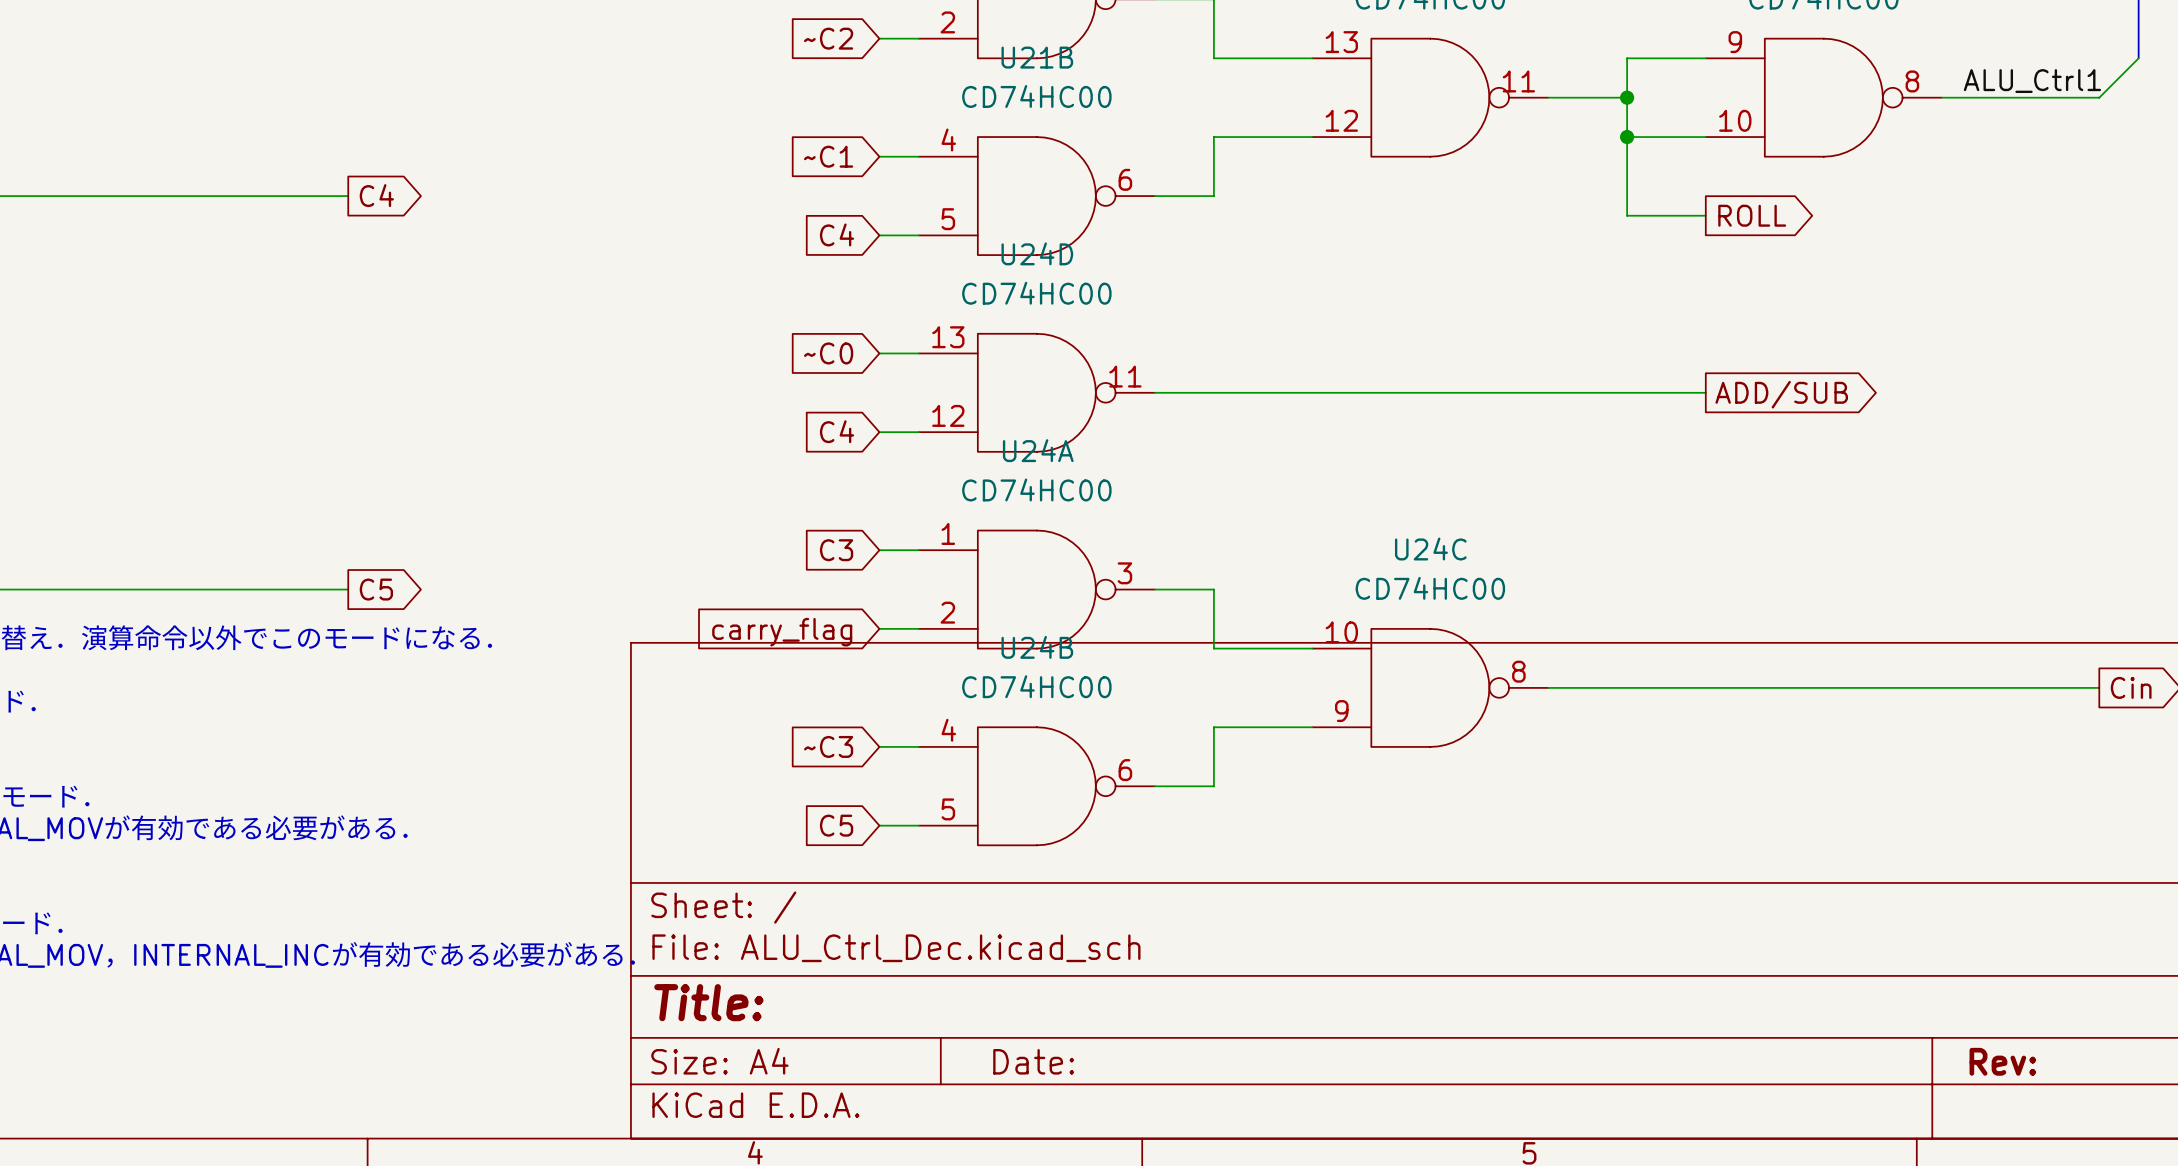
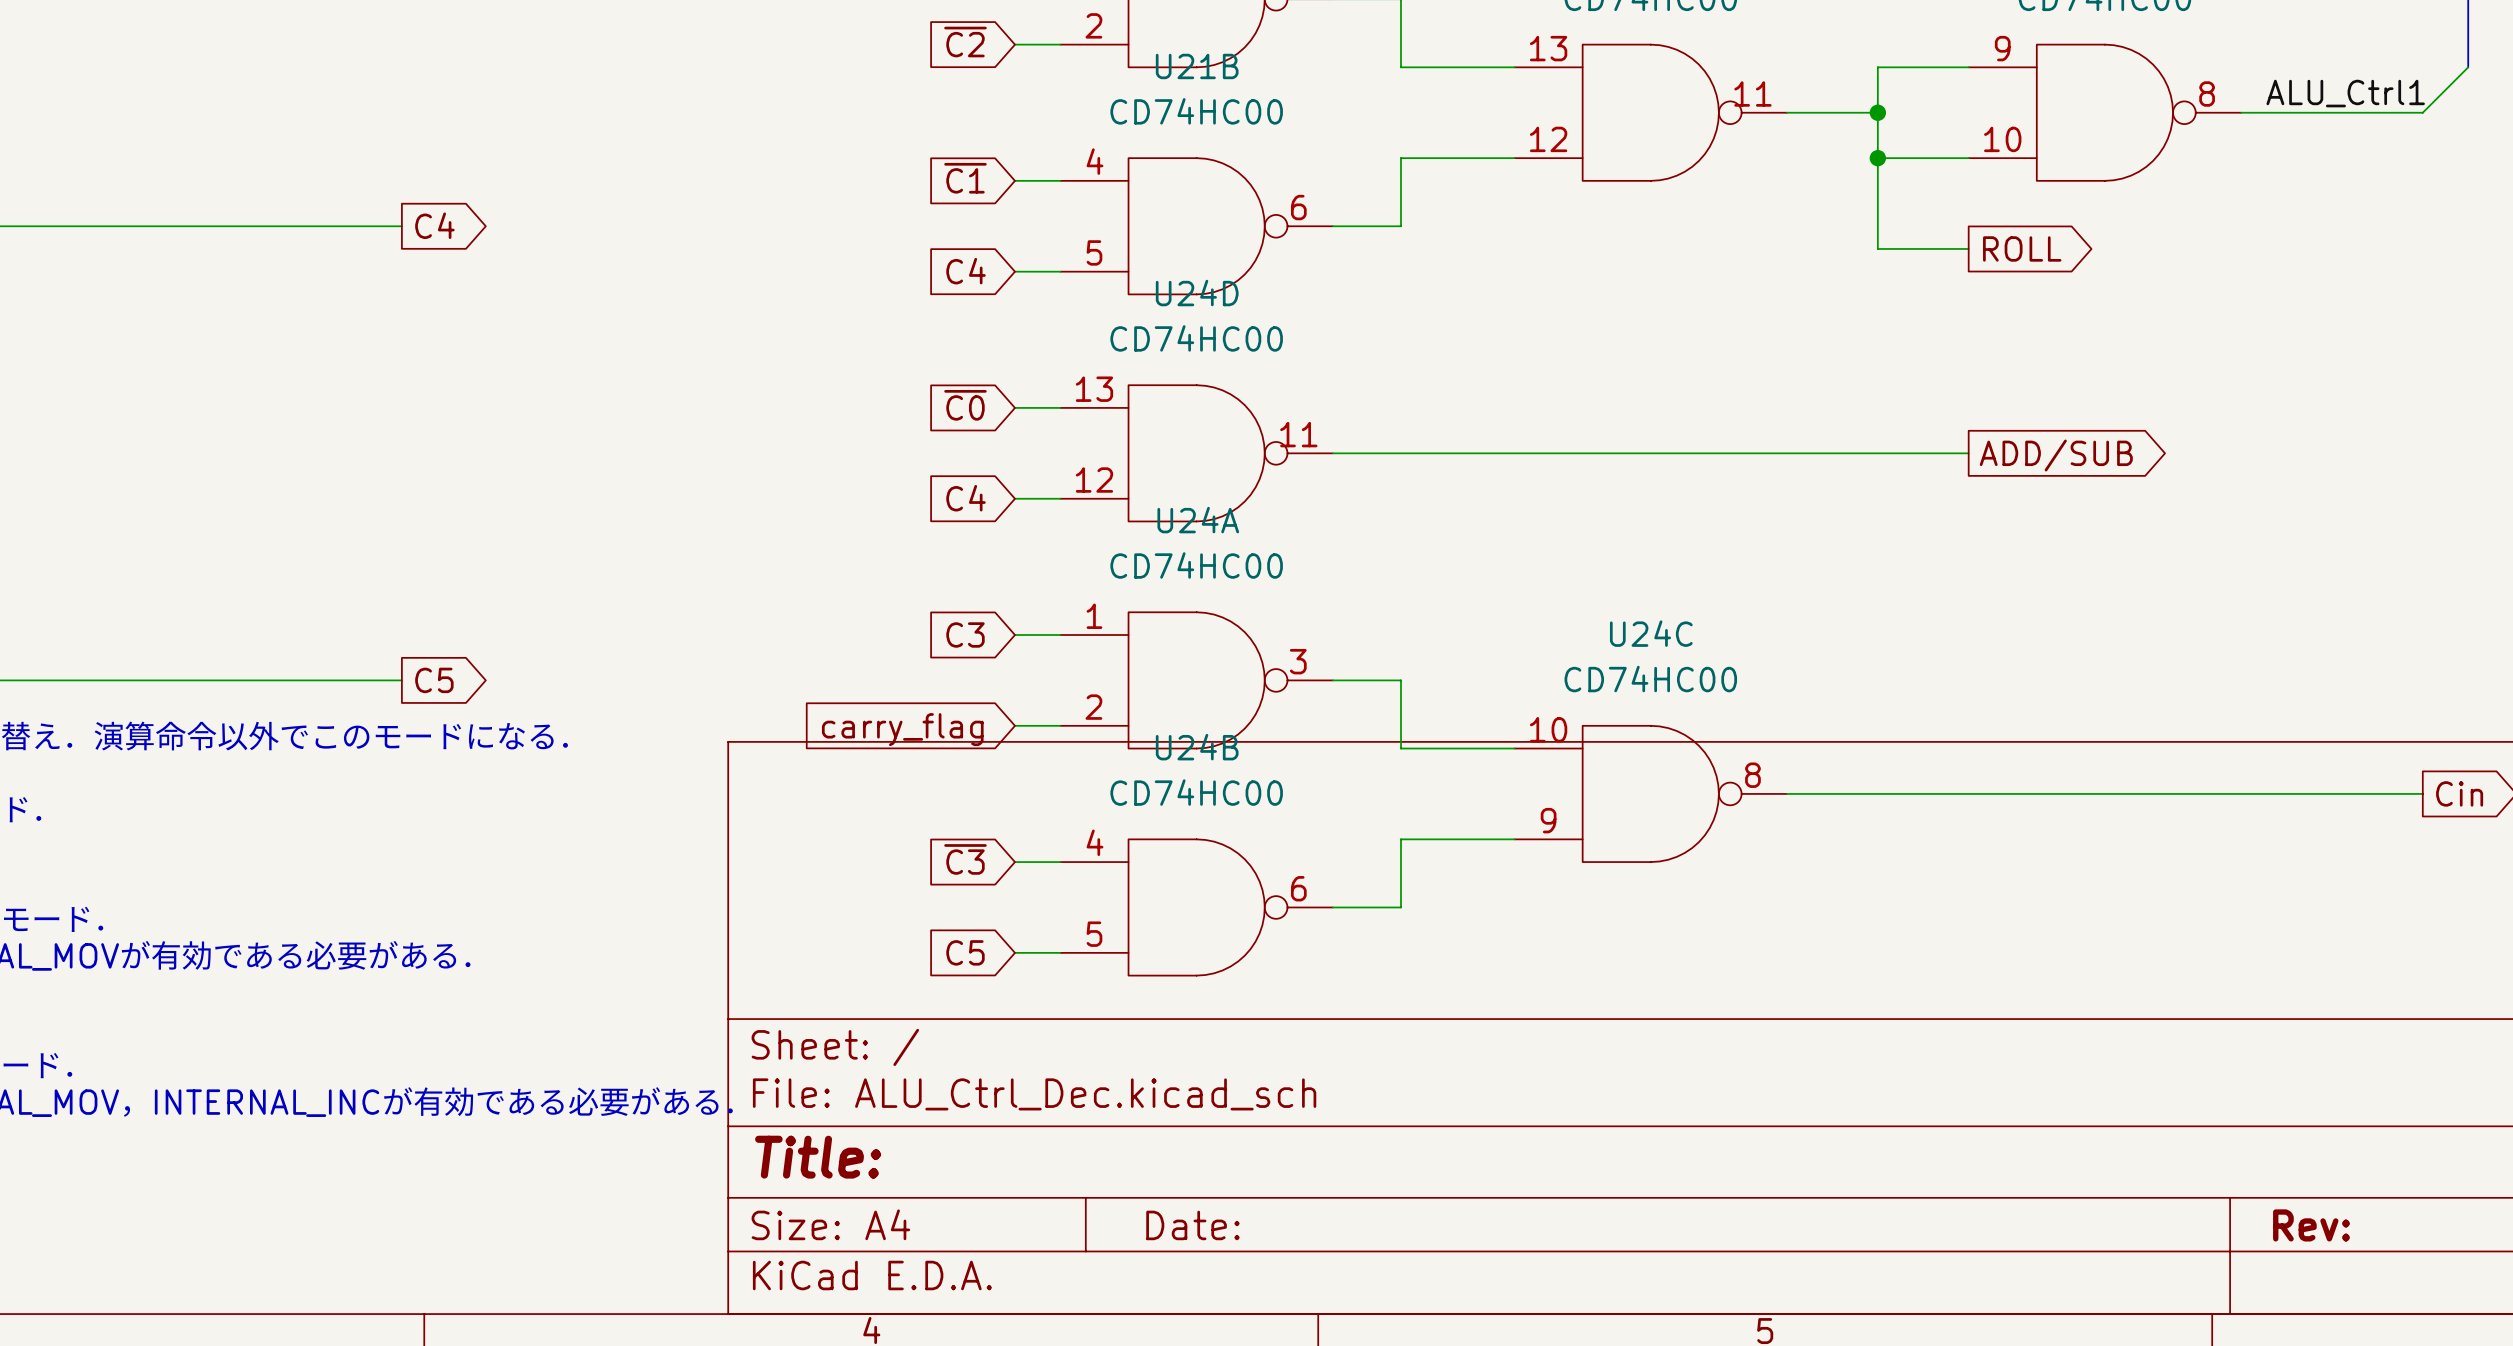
global label: ~C2 (828, 38) -> ~{C2} (965, 42)
global label: ~C1 (828, 156) -> ~{C1} (965, 178)
global label: ~C0 (828, 353) -> ~{C0} (965, 405)
global label: ~C3 (828, 746) -> ~{C3} (965, 859)

